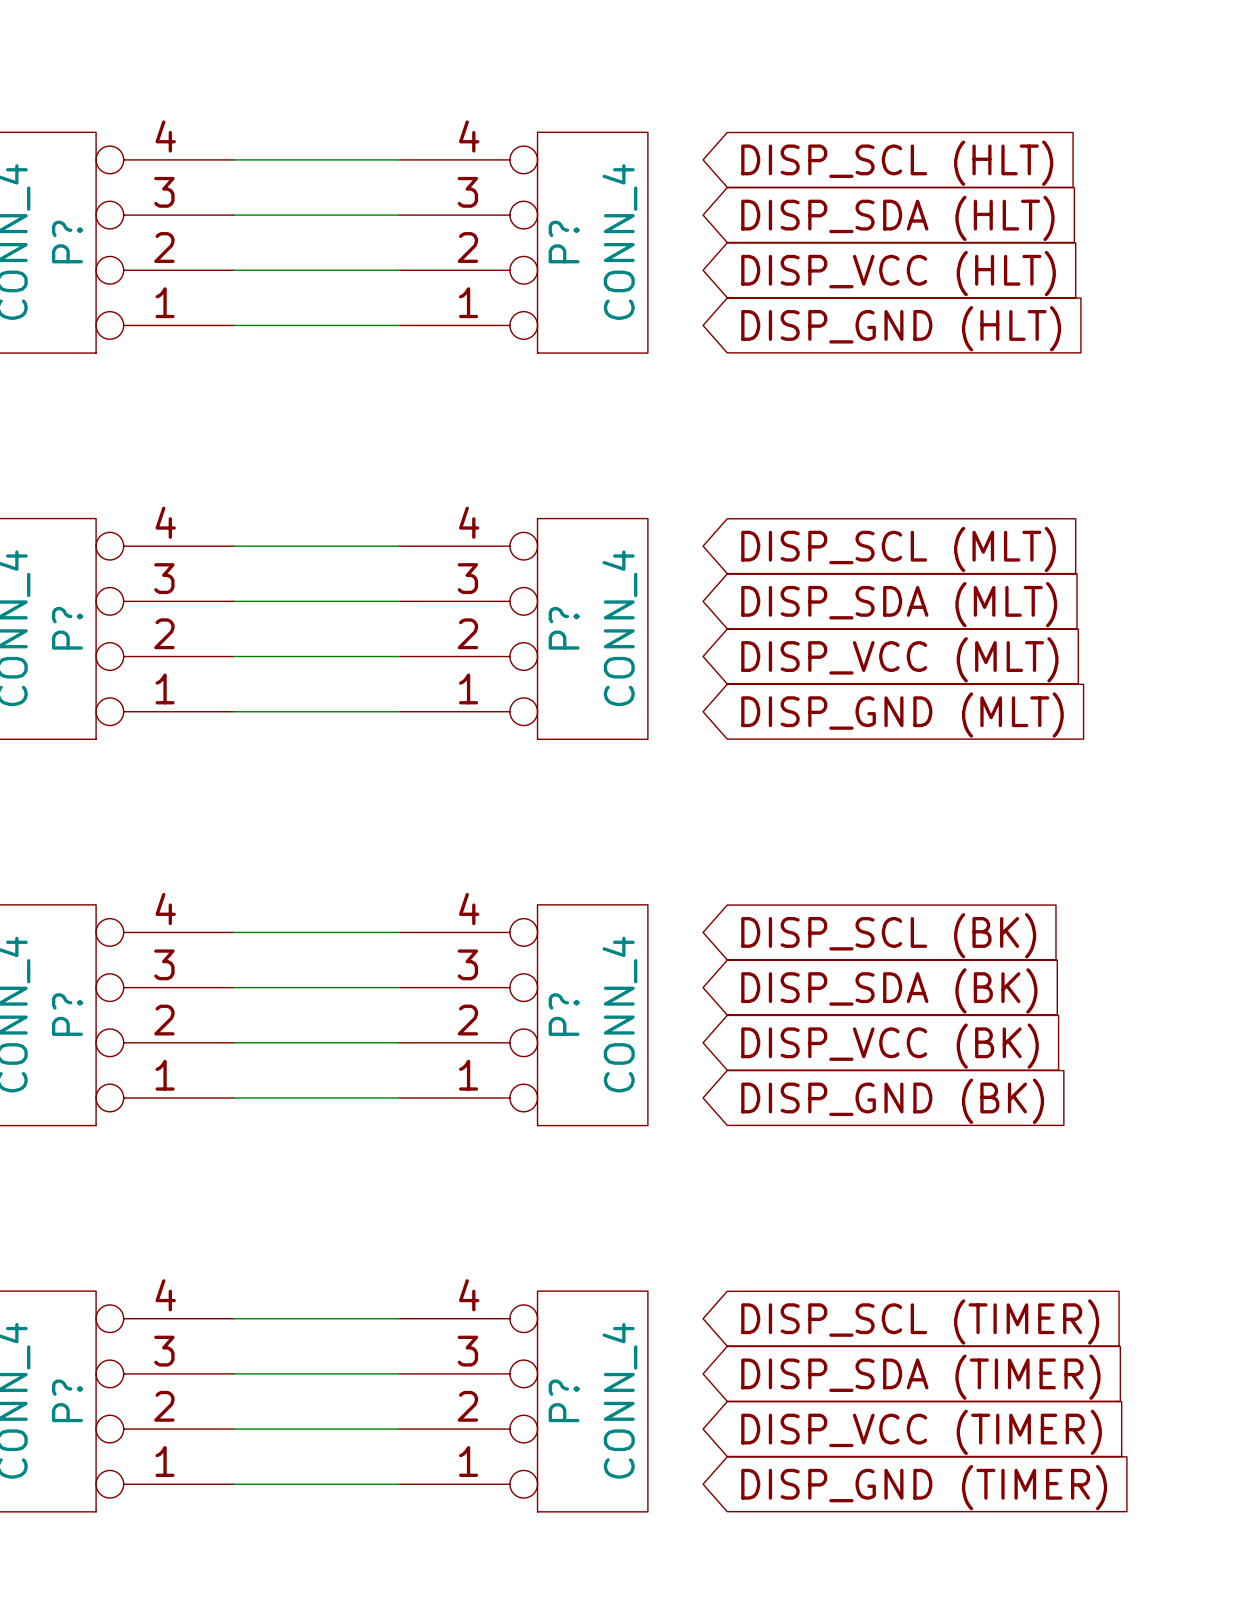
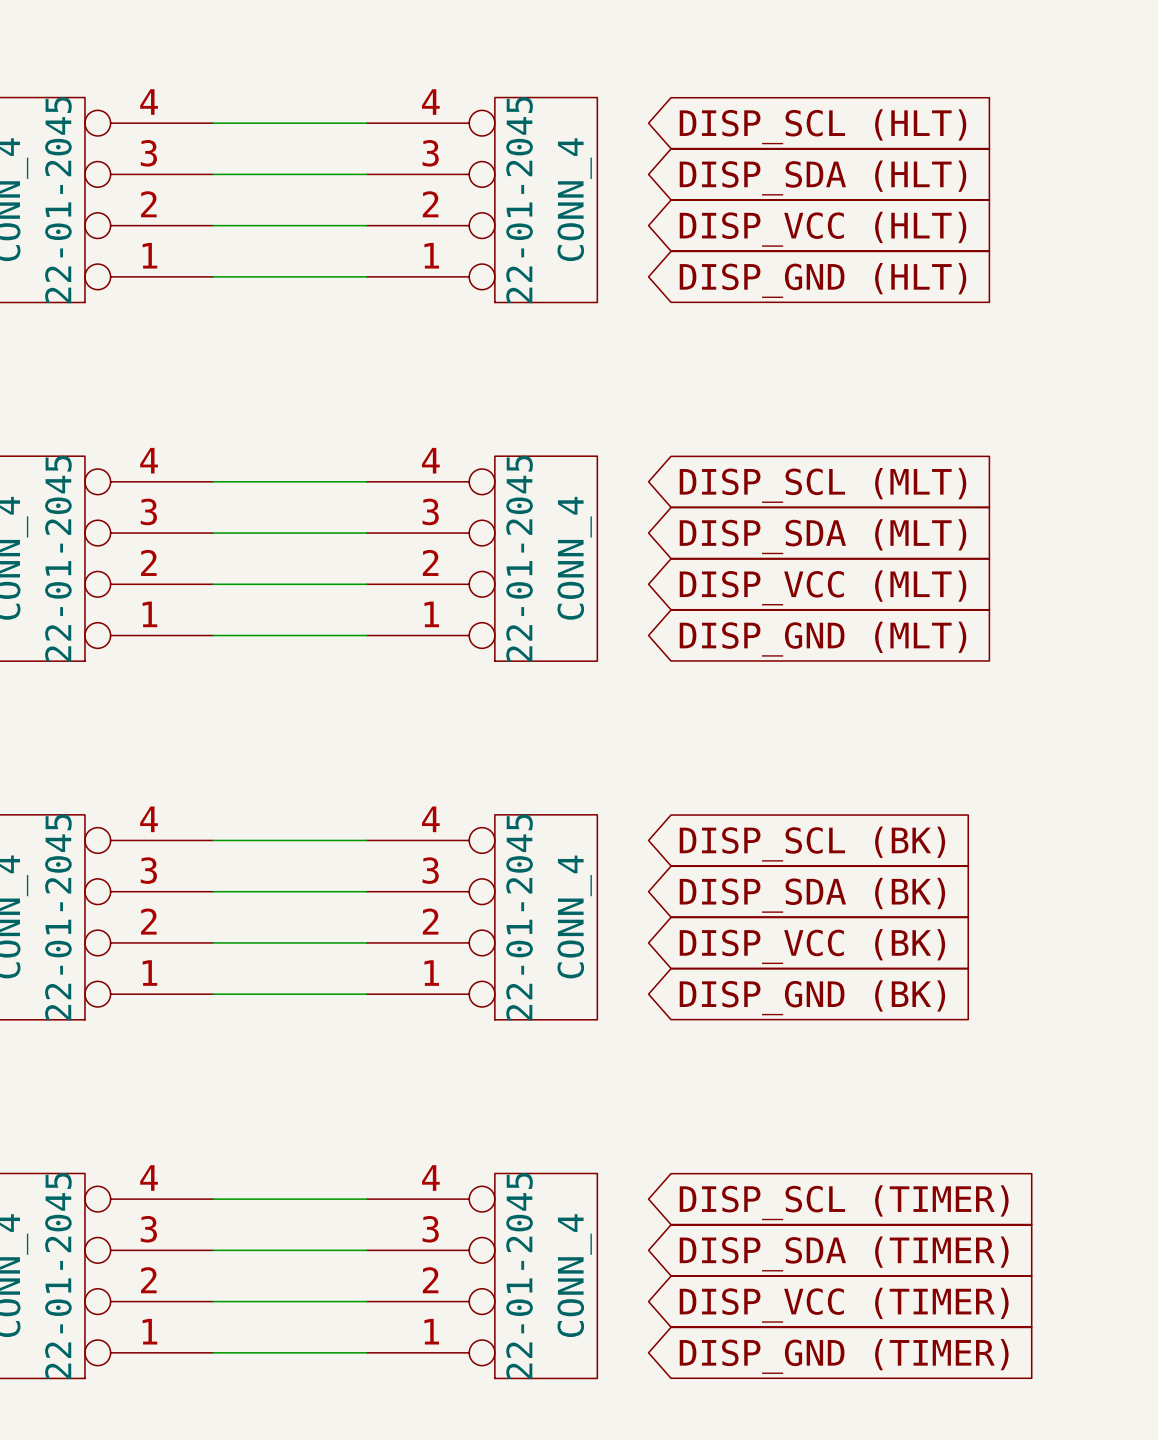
P? name: P? (67, 242) -> 22-01-2045 (58, 200)
P? name: P? (564, 242) -> 22-01-2045 (519, 200)
P? name: P? (67, 628) -> 22-01-2045 (58, 558)
P? name: P? (564, 628) -> 22-01-2045 (519, 558)
P? name: P? (67, 1014) -> 22-01-2045 (58, 917)
P? name: P? (564, 1014) -> 22-01-2045 (519, 917)
P? name: P? (67, 1400) -> 22-01-2045 (58, 1276)
P? name: P? (564, 1400) -> 22-01-2045 (519, 1276)

